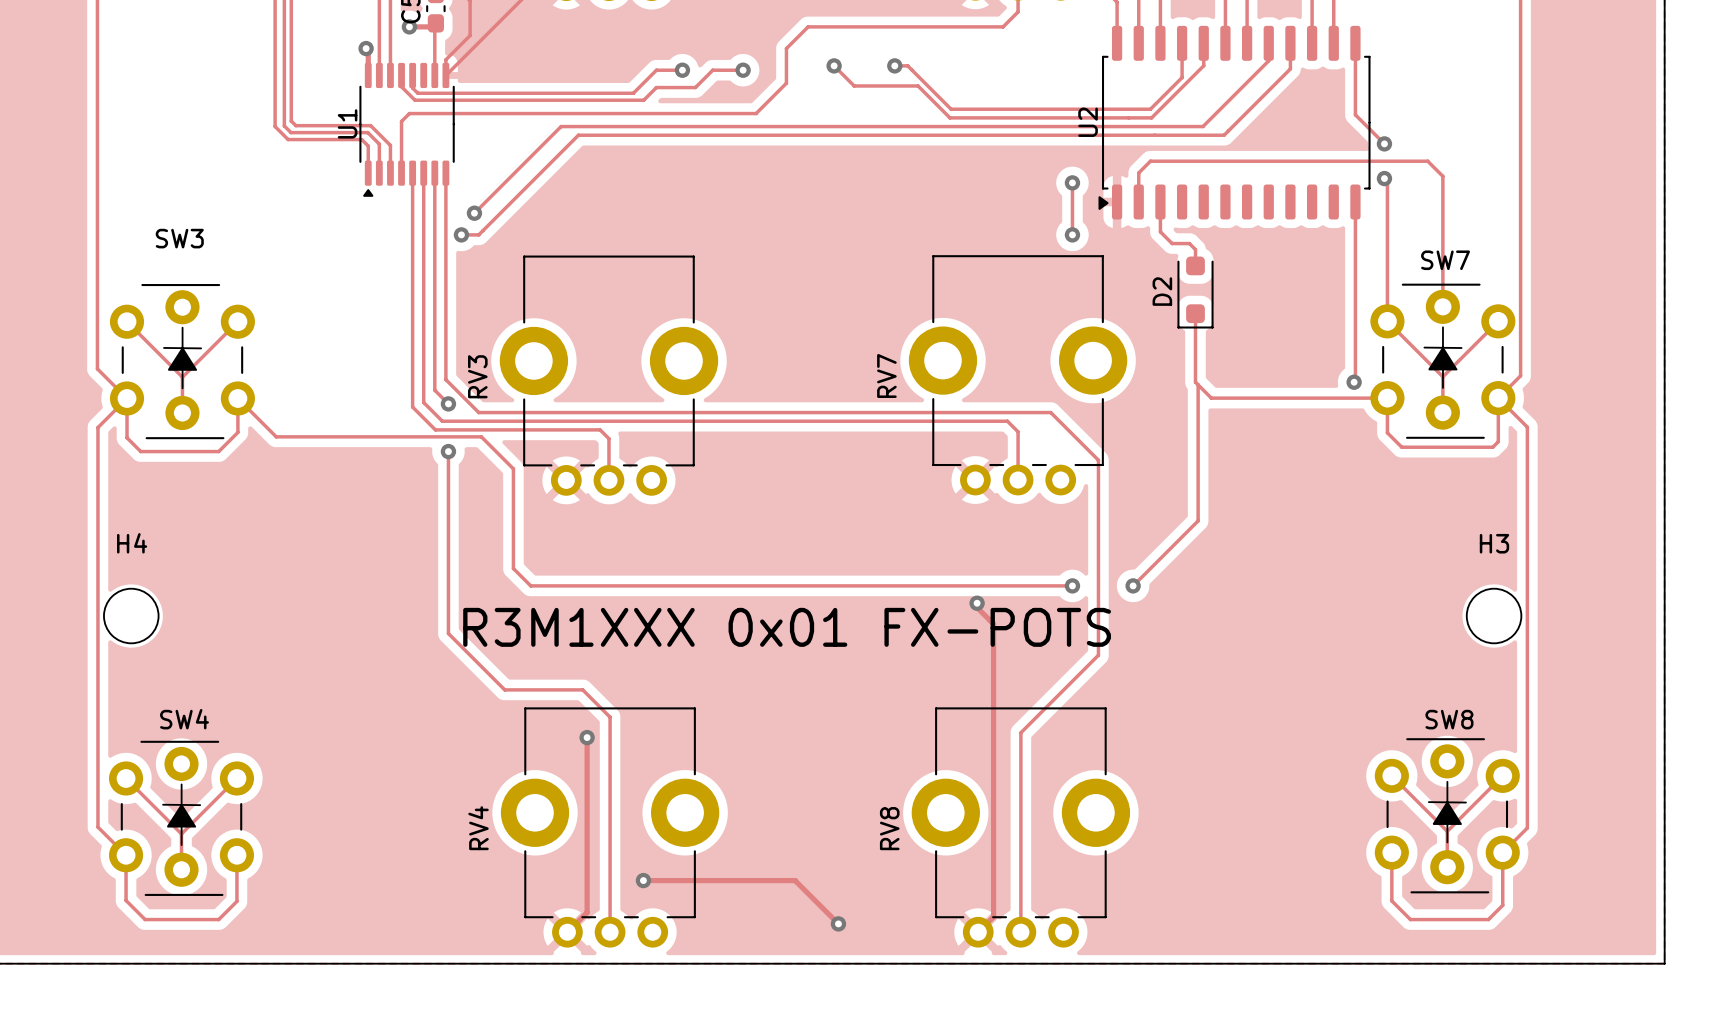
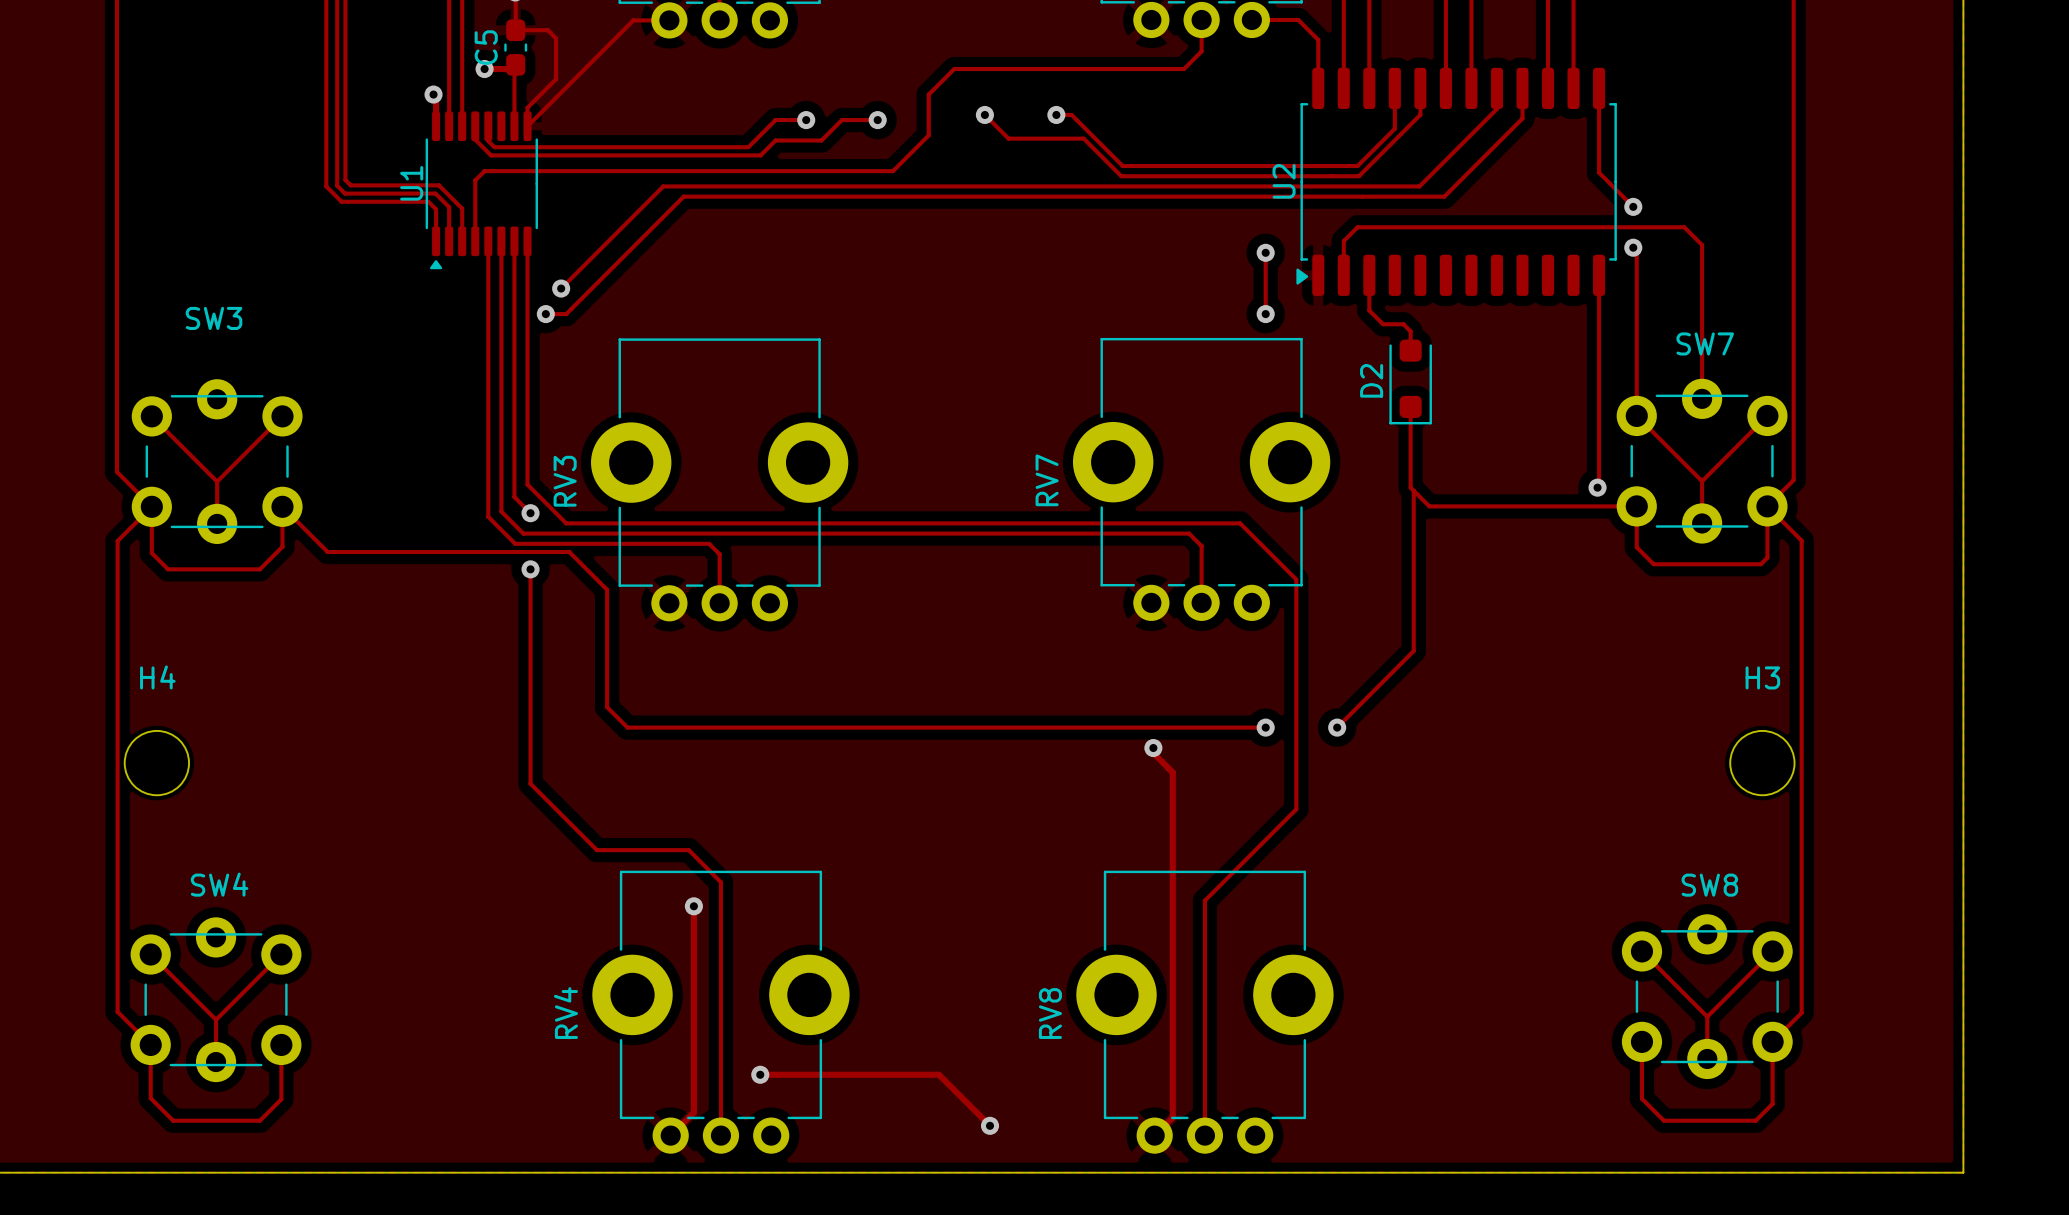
SW7 footprint: [1370, 283, 1516, 439] -> [1616, 378, 1788, 544]
SW3 footprint: [109, 284, 255, 440] -> [131, 379, 303, 545]
text: R3M1XXX 0x01 FX-POTS (787, 627) -> none
SW8 footprint: [1374, 738, 1520, 894] -> [1621, 914, 1793, 1080]
SW4 footprint: [108, 740, 255, 896] -> [130, 917, 302, 1083]

